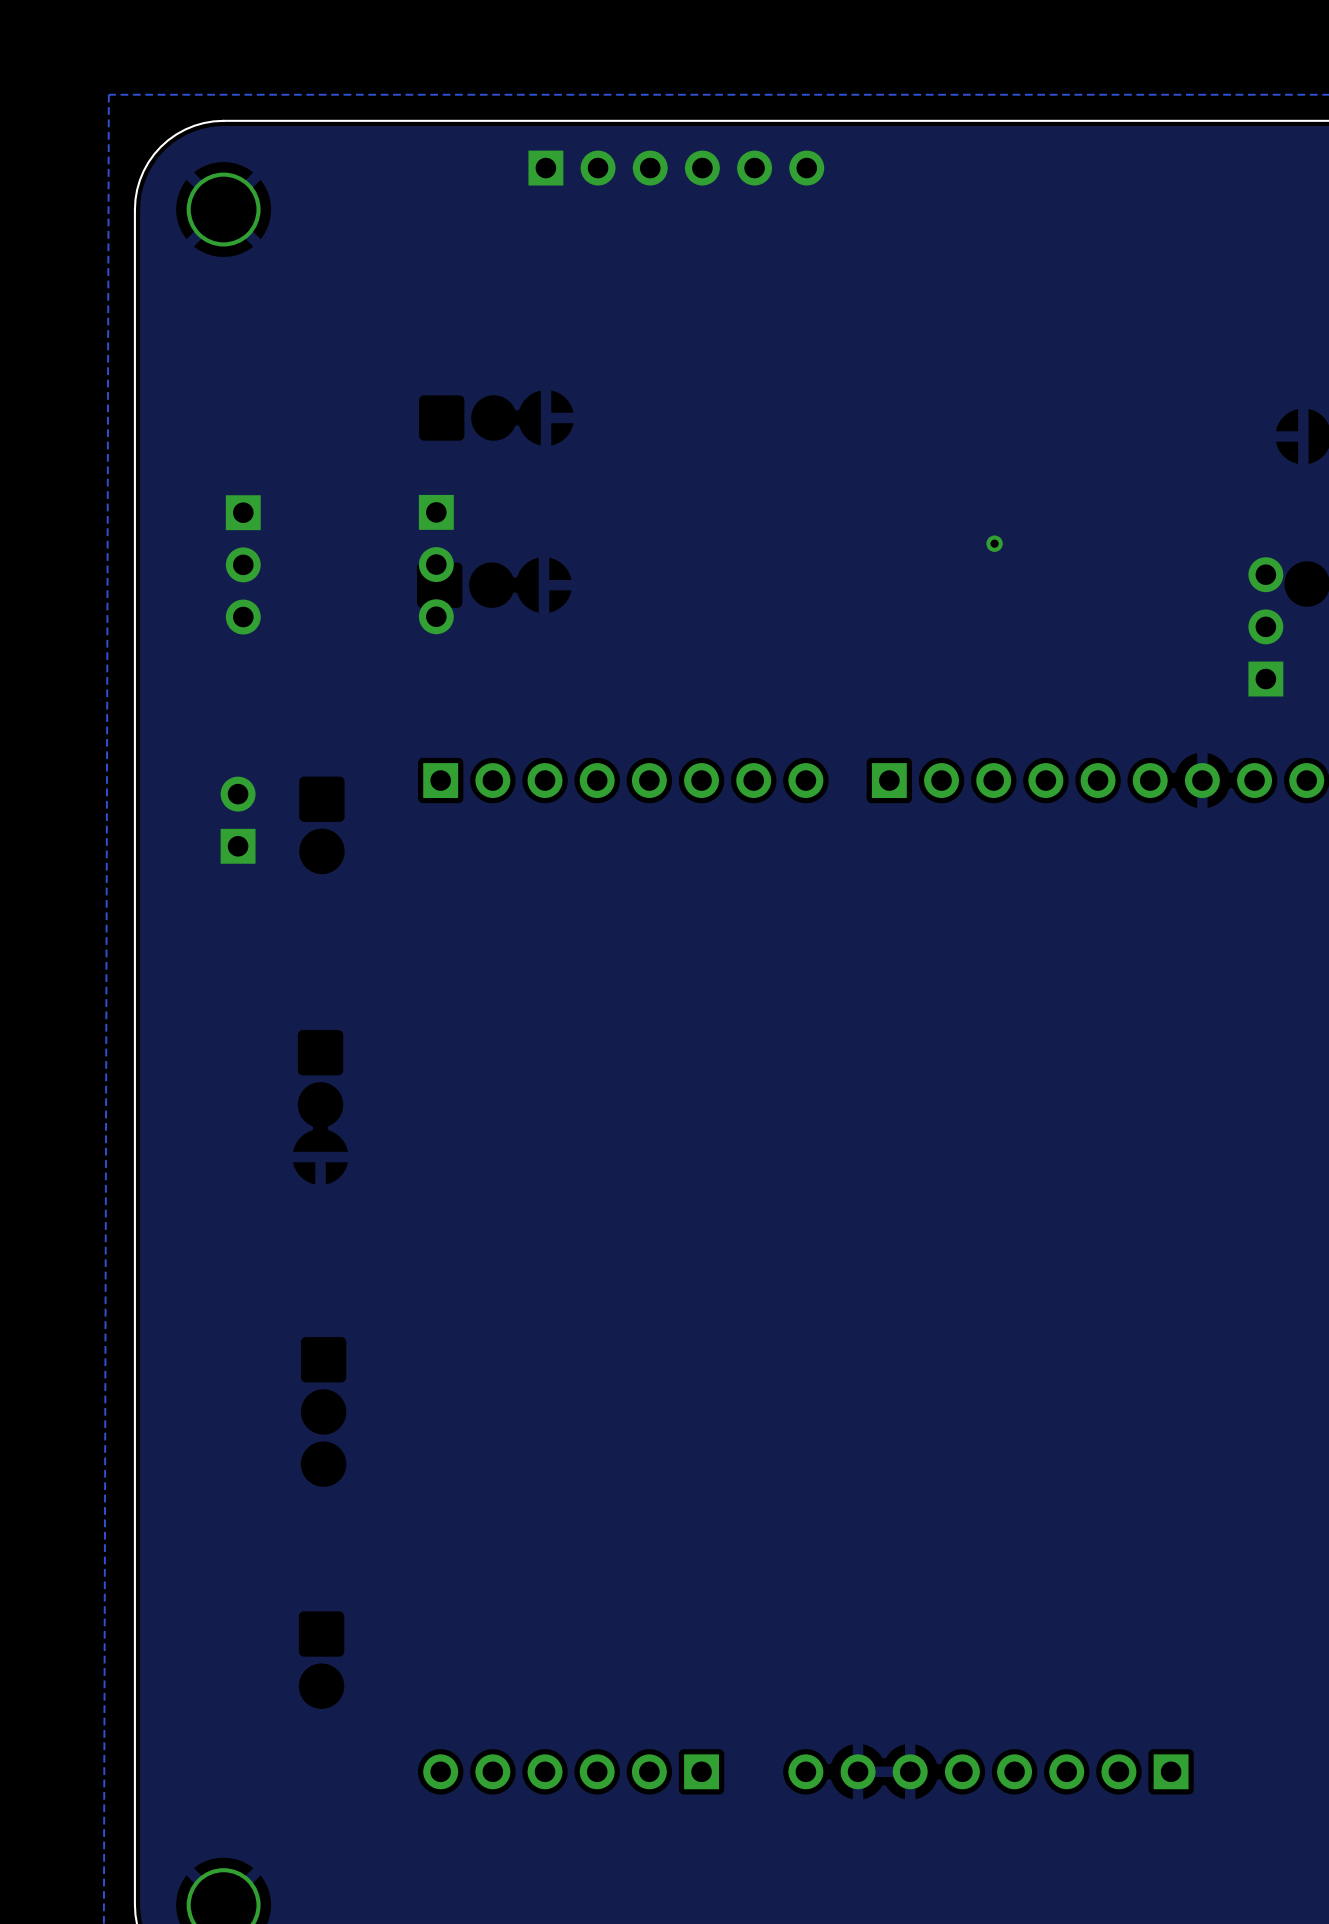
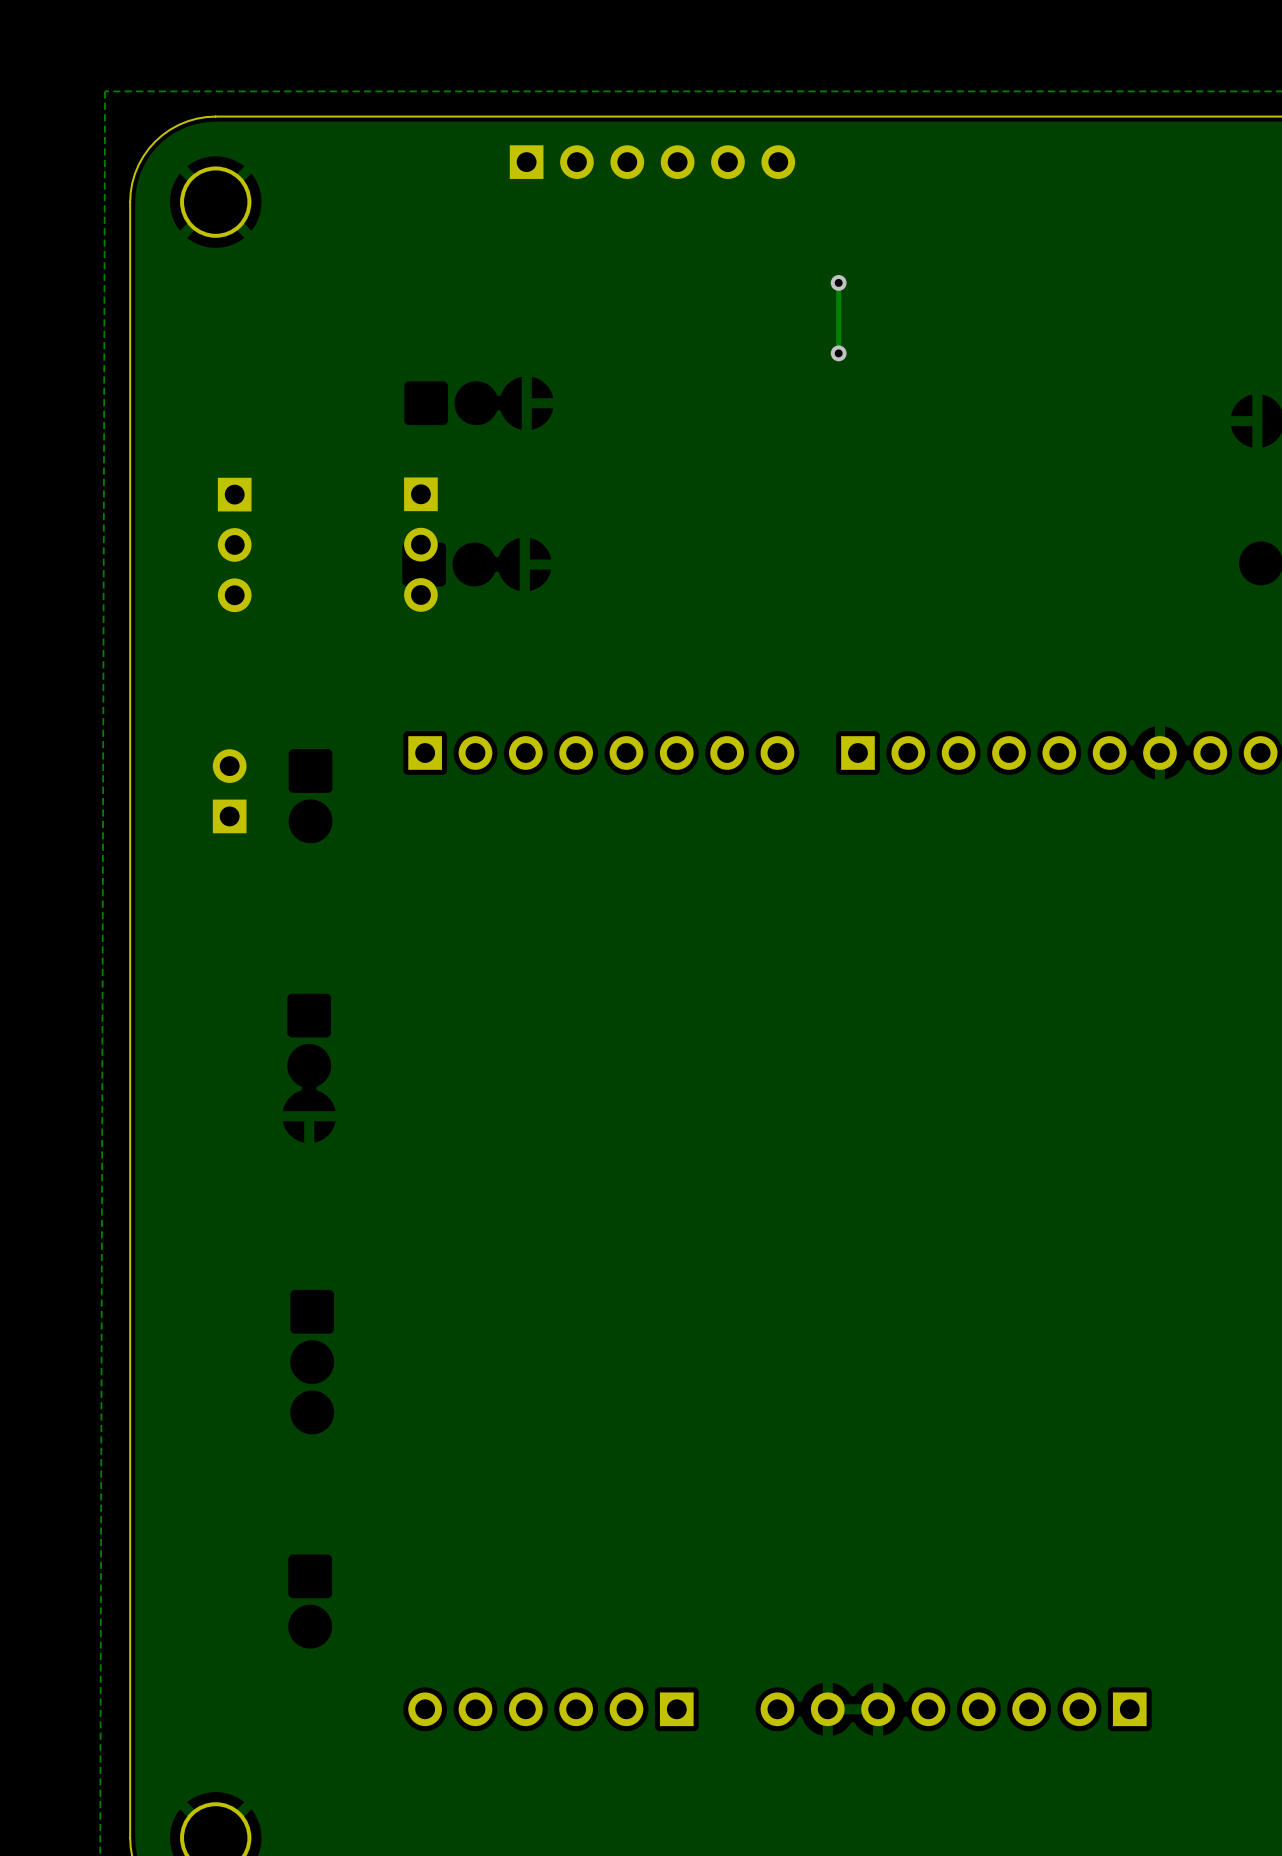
track: none -> (838, 282) (838, 353)
via: none -> (838, 282)
via: none -> (838, 353)
via: (994, 543) -> none
part: (1265, 626) -> none

